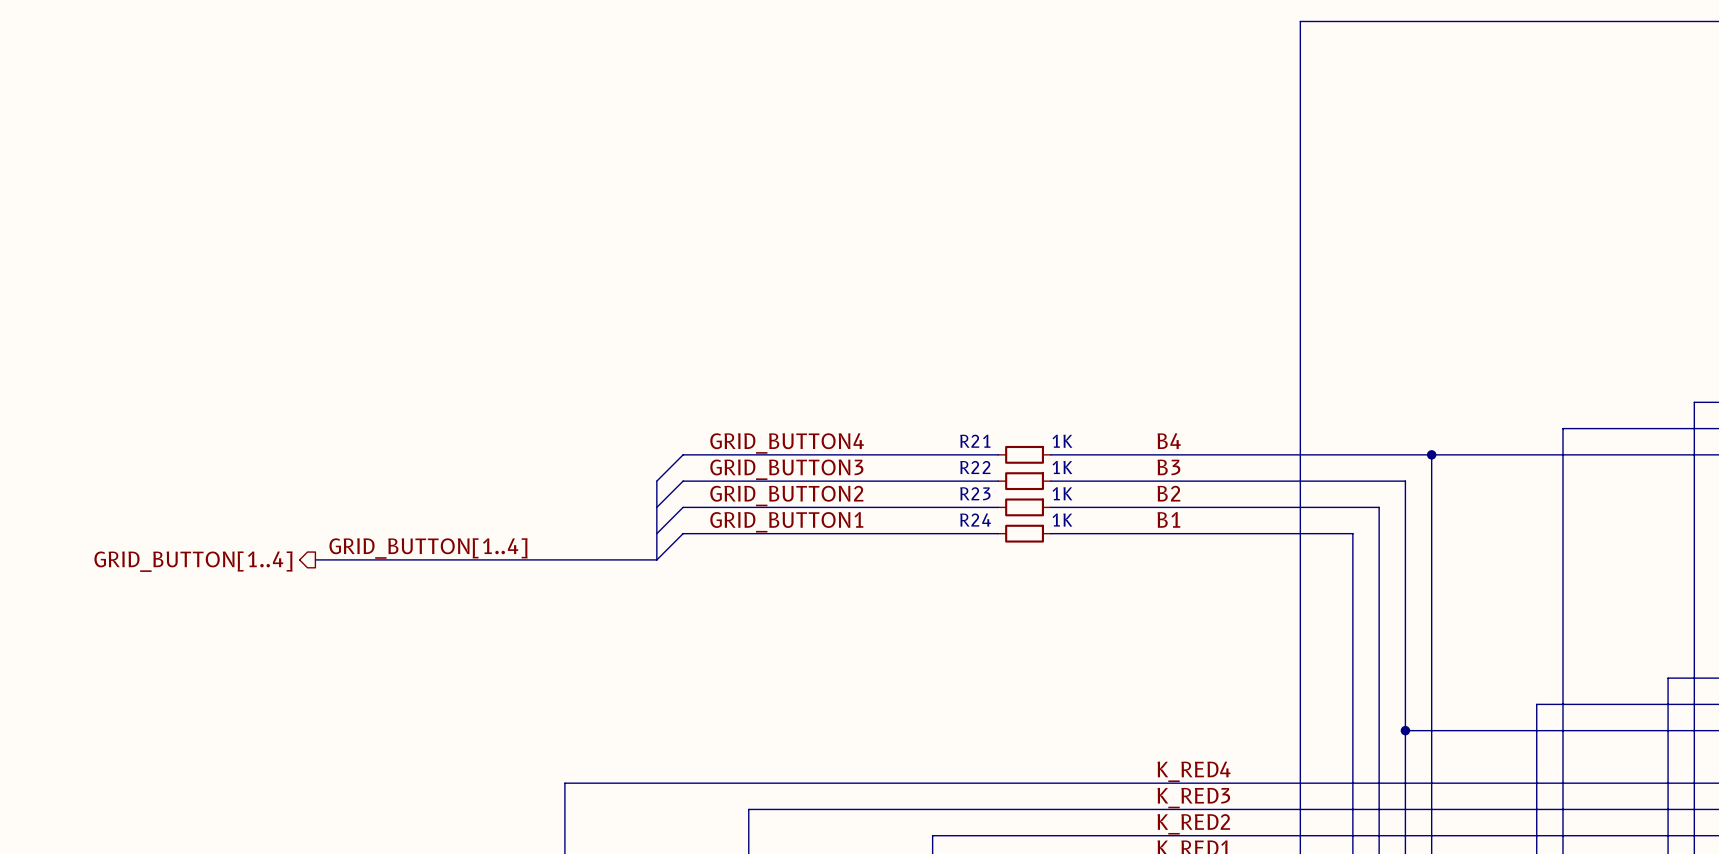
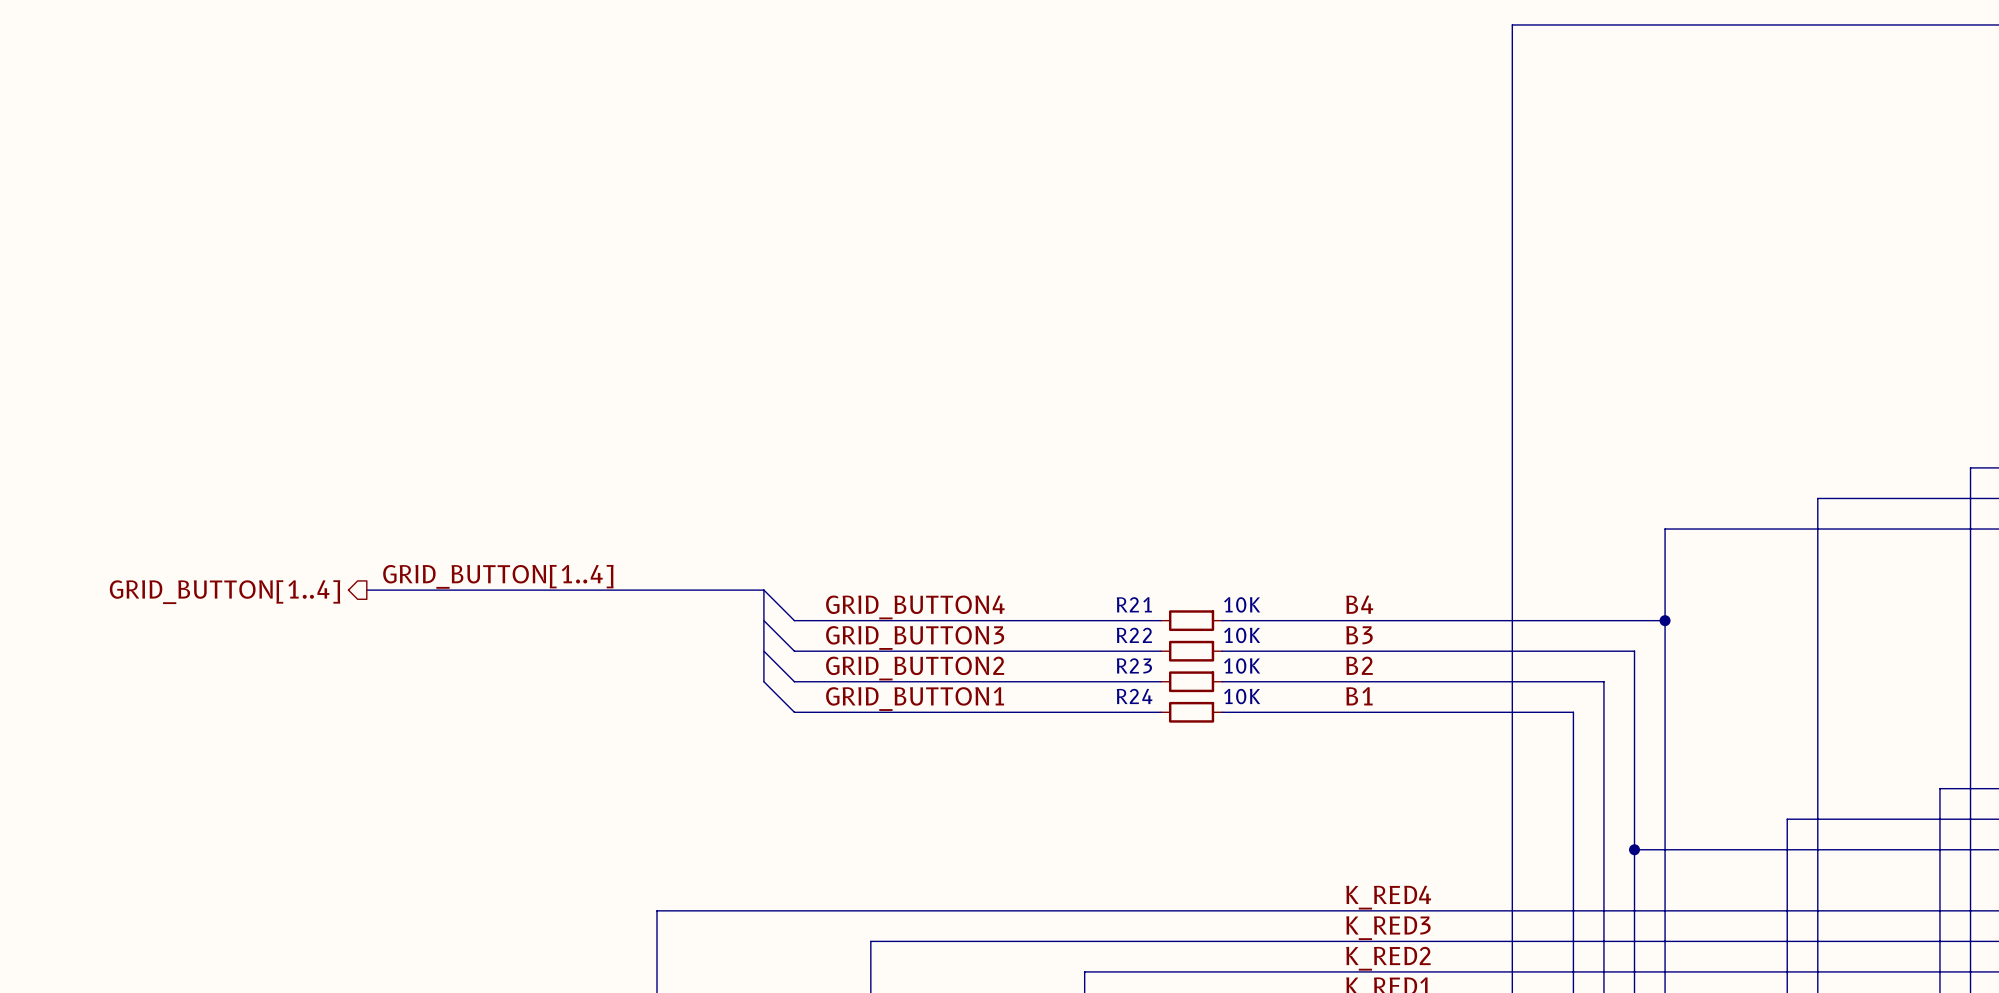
label: B4 (1169, 441) -> none
label: GRID_BUTTON4 (787, 443) -> none
wire: (998, 454) (683, 454) (656, 481) -> none
R21: 1K (1024, 454) -> none
wire: (1050, 454) (1431, 454) -> none
junction: (1431, 454) -> none
R22 value: 1K (1062, 467) -> 10K (1242, 635)
label position: B3 (1168, 467) -> B3 (1359, 635)
label position: GRID_BUTTON3 (786, 469) -> GRID_BUTTON3 (915, 637)
bus: (656, 481) (656, 507) -> (366, 590) (763, 590)
wire: (998, 481) (683, 481) (656, 507) -> none
R22 position: (1024, 481) -> (1191, 651)
wire: (1050, 481) (1405, 481) (1405, 559) -> (1222, 651) (1634, 651)
R23 value: 1K (1062, 493) -> 10K (1242, 665)
label position: B2 (1168, 493) -> B2 (1359, 665)
label position: GRID_BUTTON2 (786, 496) -> GRID_BUTTON2 (915, 668)
wire: (998, 507) (683, 507) (656, 533) -> (1161, 651) (794, 651) (763, 620)
R23 position: (1024, 507) -> (1191, 681)
wire: (1050, 507) (1379, 507) (1379, 586) -> (1222, 681) (1603, 681)
label: B1 (1168, 519) -> B4 (1359, 604)
R24 name: R24 (975, 520) -> R21 (1134, 604)
R24 value: 1K (1062, 520) -> 10K (1242, 604)
label: GRID_BUTTON1 (786, 522) -> GRID_BUTTON4 (915, 607)
wire: (683, 533) (656, 559) -> (794, 620) (763, 590)
wire: (1352, 533) (1352, 612) -> (1573, 620) (1665, 620)
junction: none -> (1665, 620)
label position: GRID_BUTTON[1..4] (428, 548) -> GRID_BUTTON[1..4] (498, 576)
bus: (315, 559) (656, 559) -> (763, 681) (763, 651)
wire: none -> (763, 651) (794, 681) (1161, 681)
hierarchical label position: GRID_BUTTON[1..4] (193, 561) -> GRID_BUTTON[1..4] (225, 592)
wire: none -> (763, 681) (794, 712) (1161, 712)
label: none -> B1 (1359, 696)
label: none -> GRID_BUTTON1 (915, 699)
R24: none -> 10K (1191, 712)
wire: none -> (1222, 712) (1573, 712)

